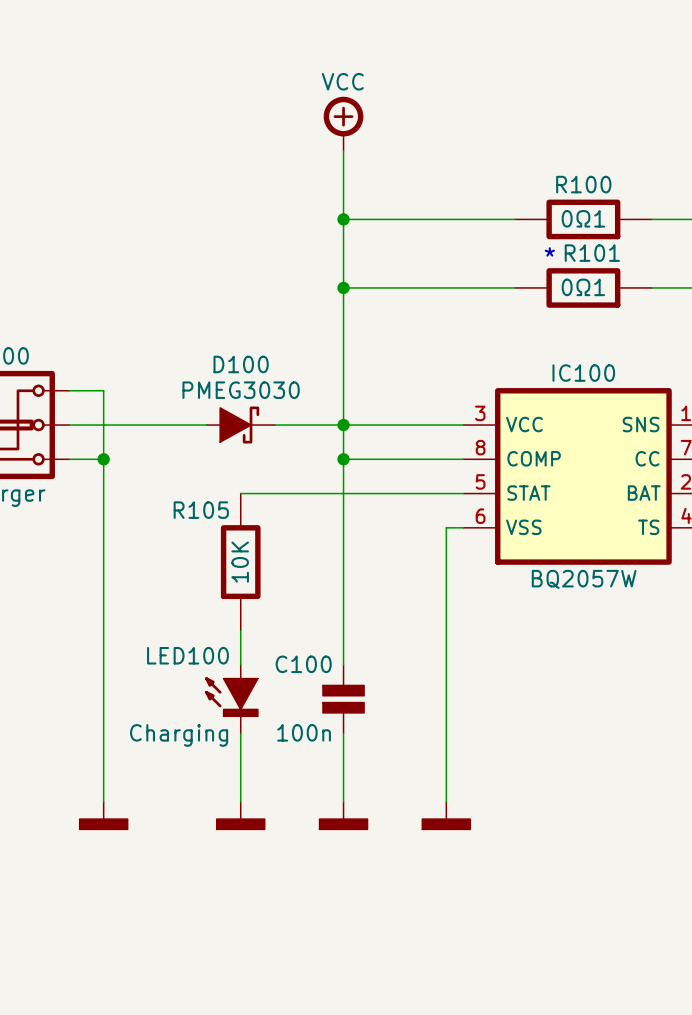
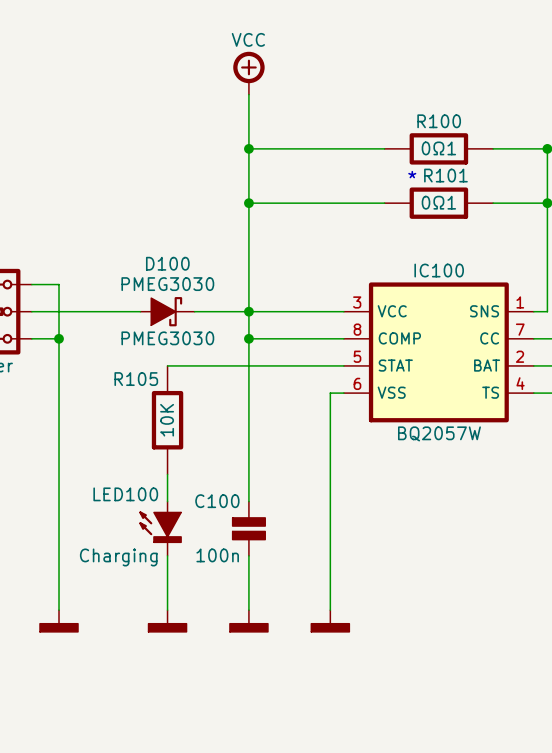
D100 text: none -> PMEG3030 (167, 338)

